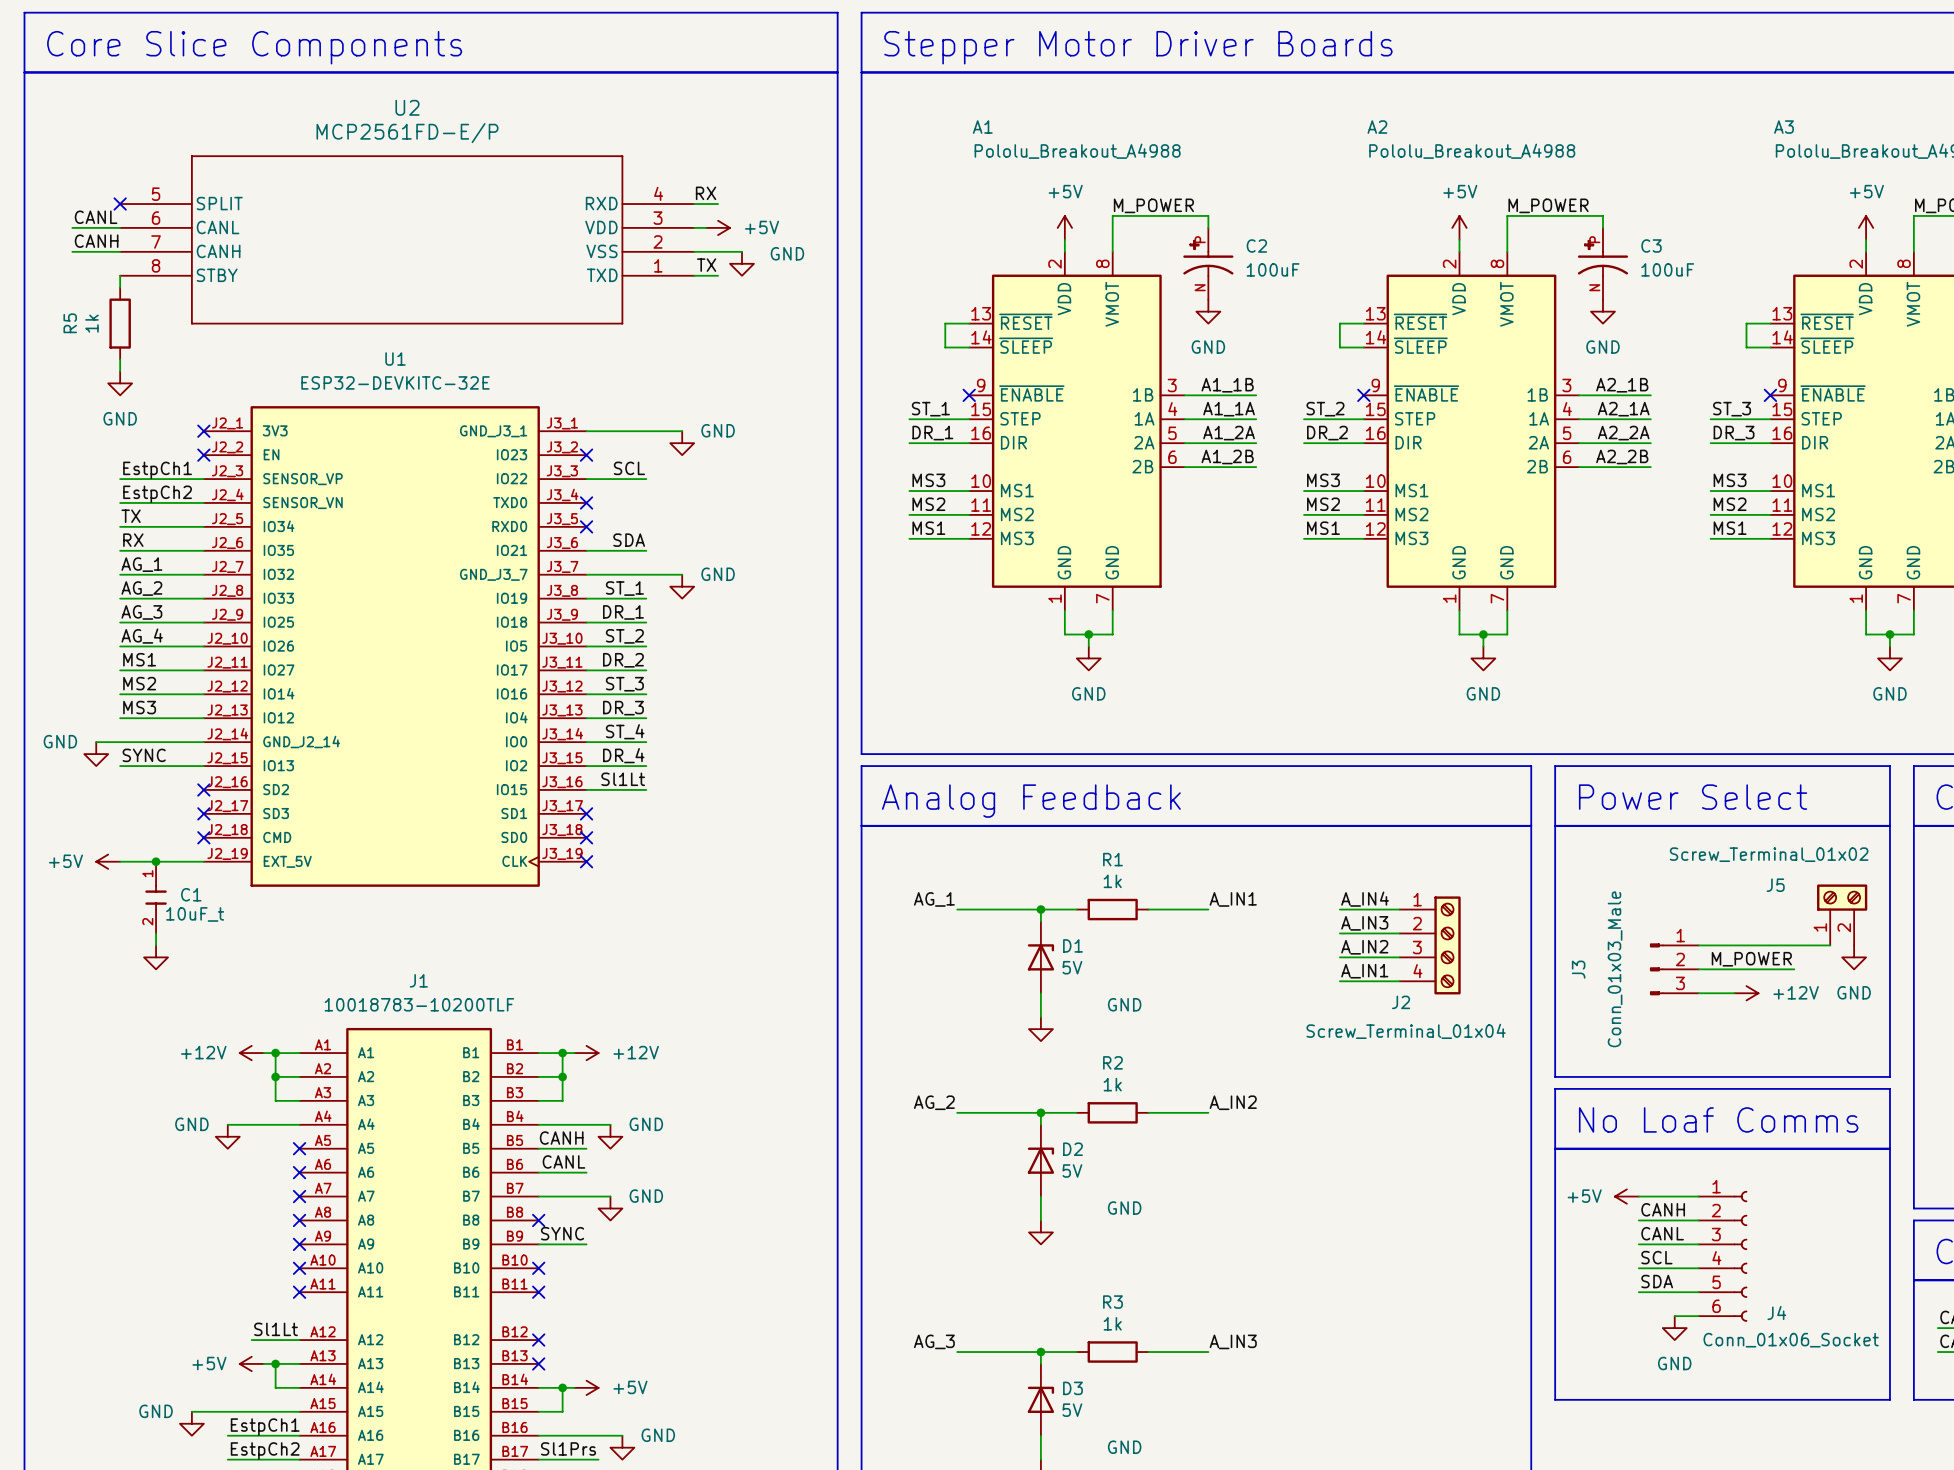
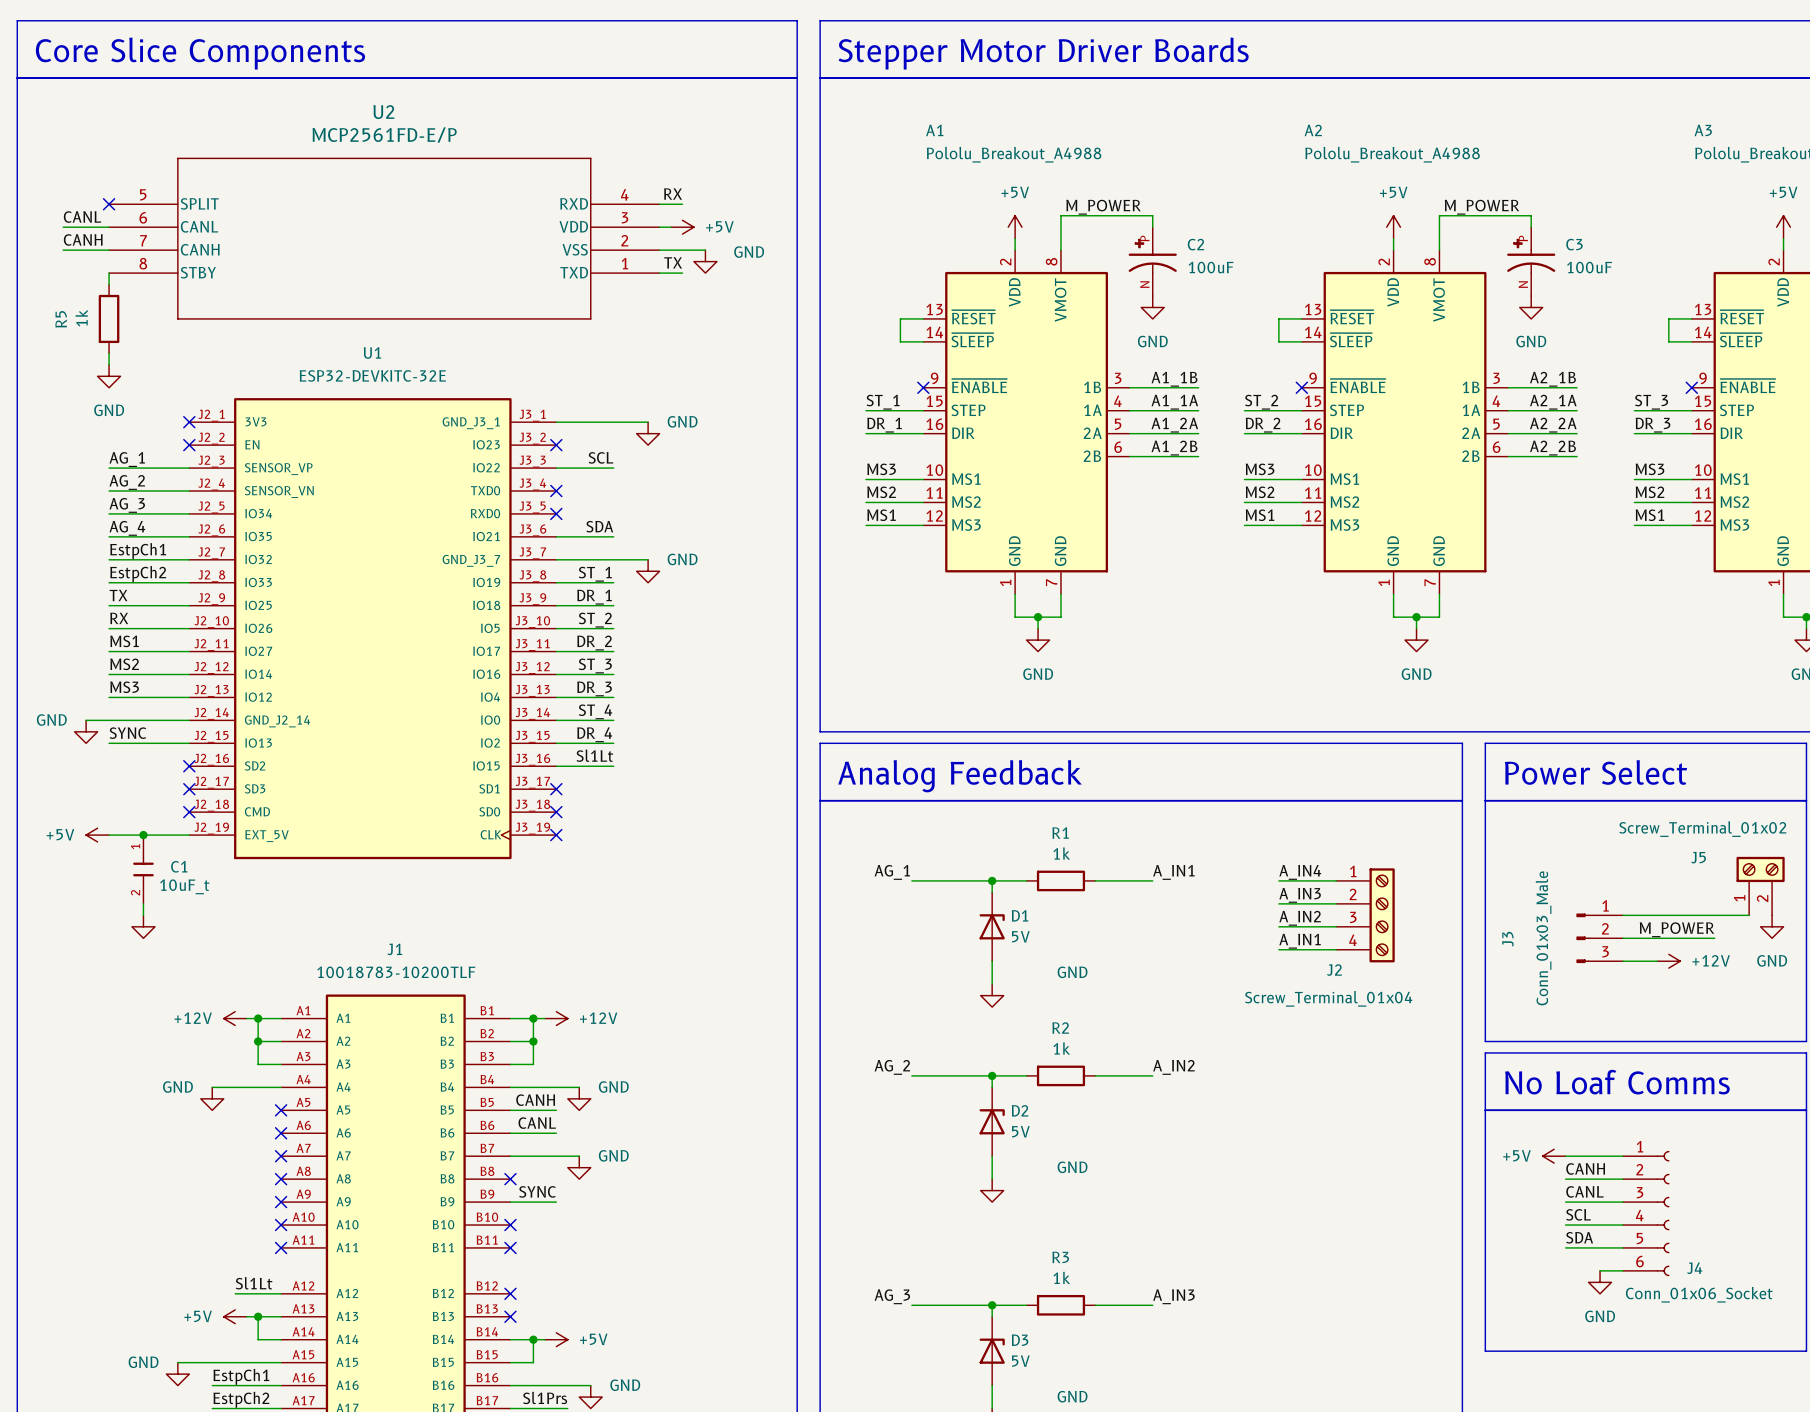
label: EstpCh1 (157, 470) -> AG_1 (127, 459)
label: EstpCh2 (157, 494) -> AG_2 (127, 482)
label: TX (131, 516) -> AG_3 (127, 505)
label: RX (133, 540) -> AG_4 (127, 528)
label: AG_1 (141, 564) -> EstpCh1 (138, 551)
label: AG_2 (141, 588) -> EstpCh2 (138, 574)
label: AG_3 (141, 612) -> TX (118, 595)
label: AG_4 (142, 636) -> RX (119, 618)

